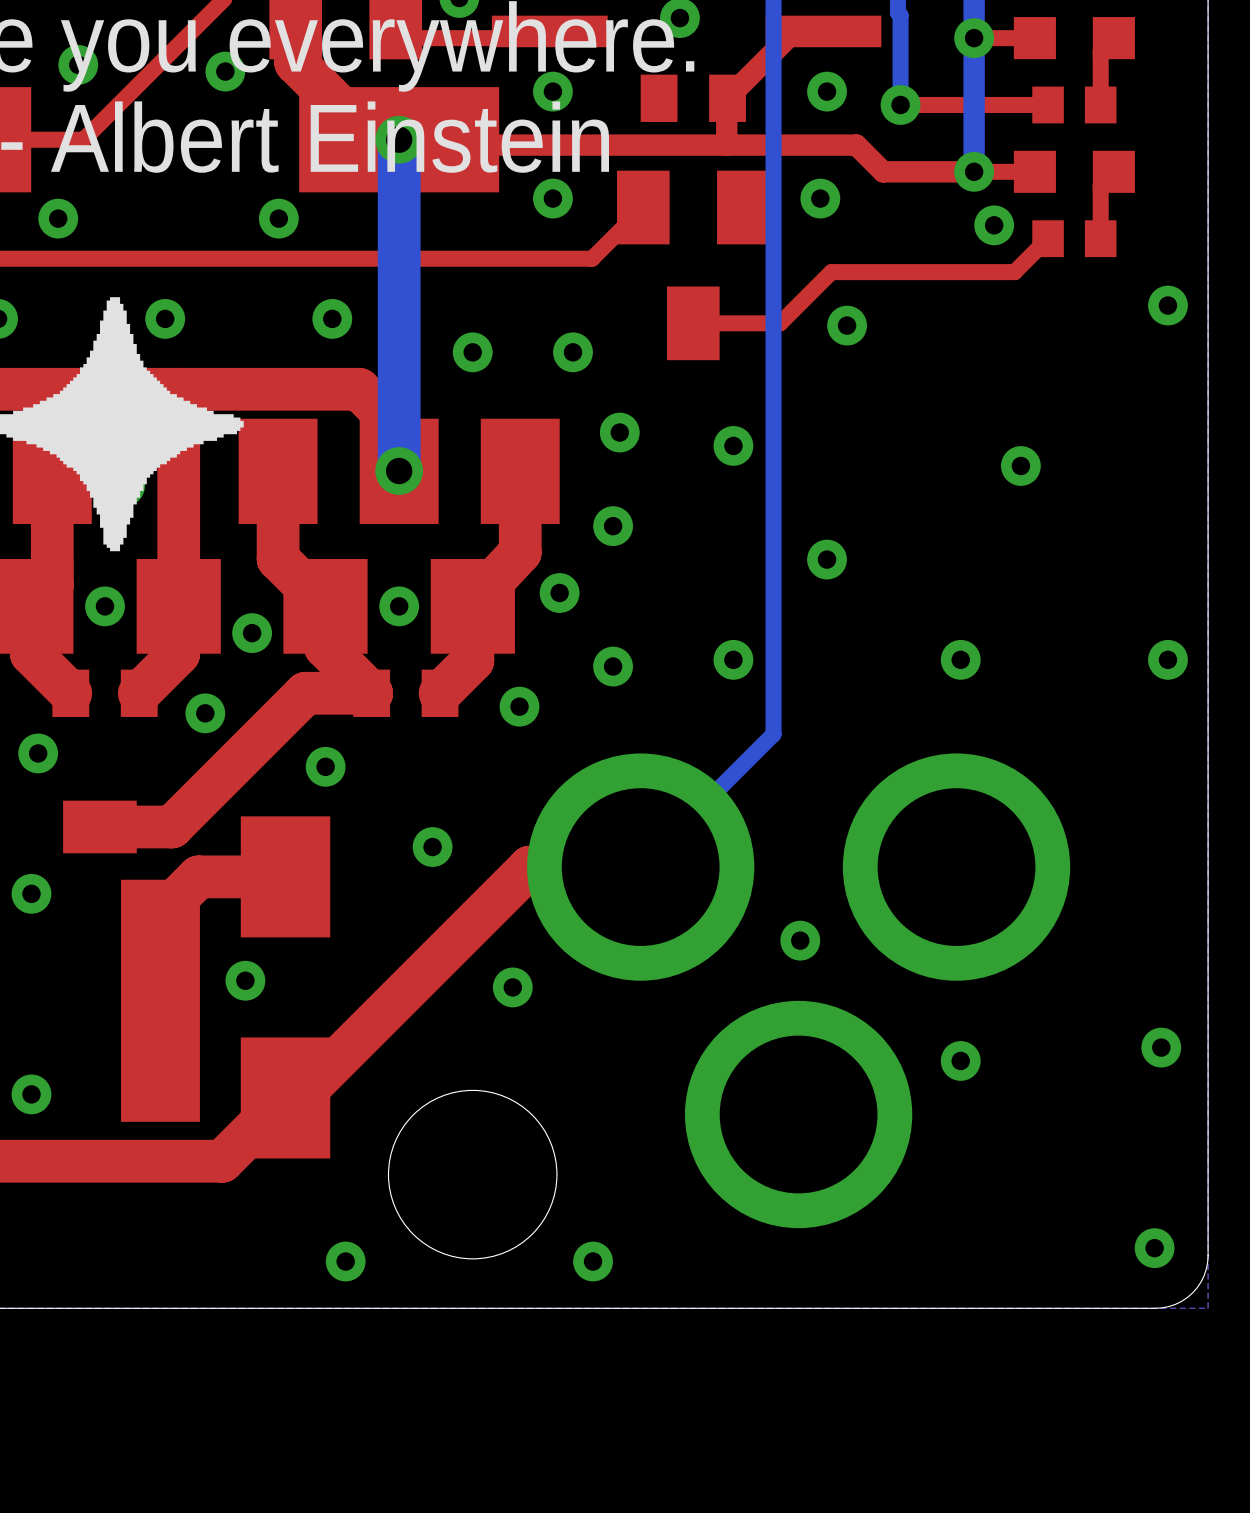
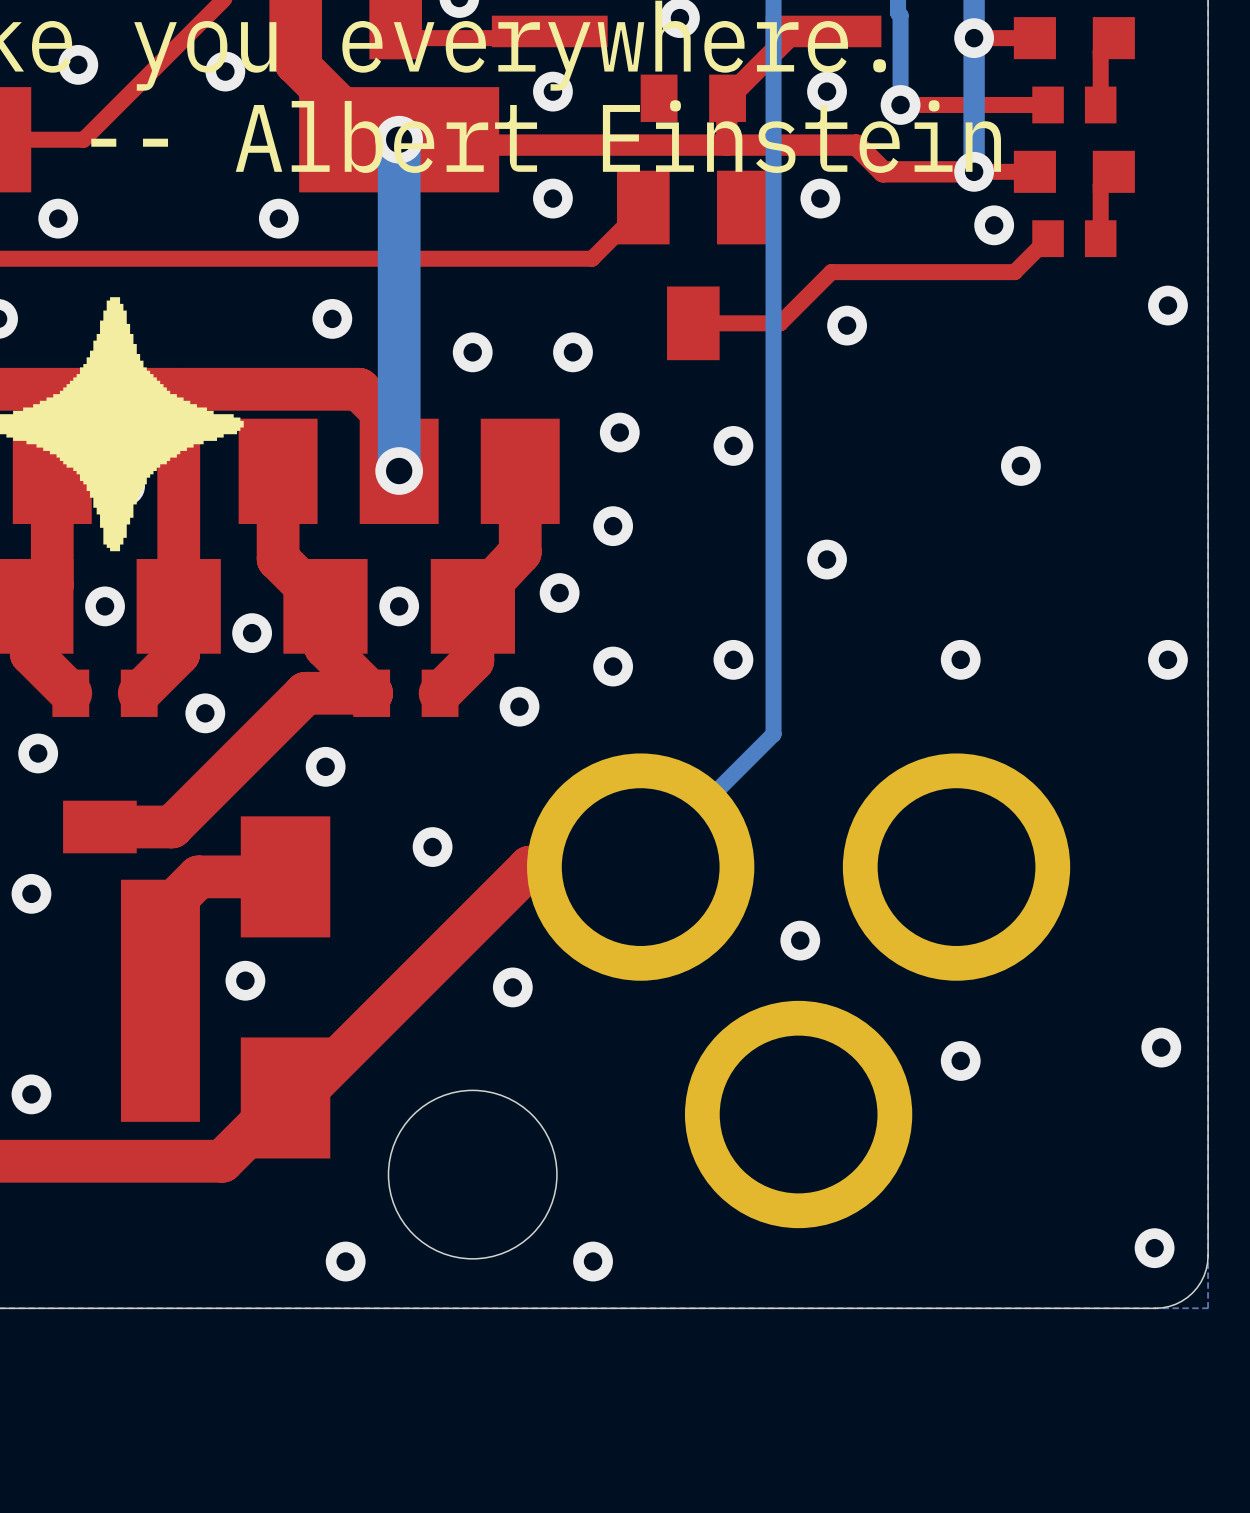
via: (165, 318) -> none

